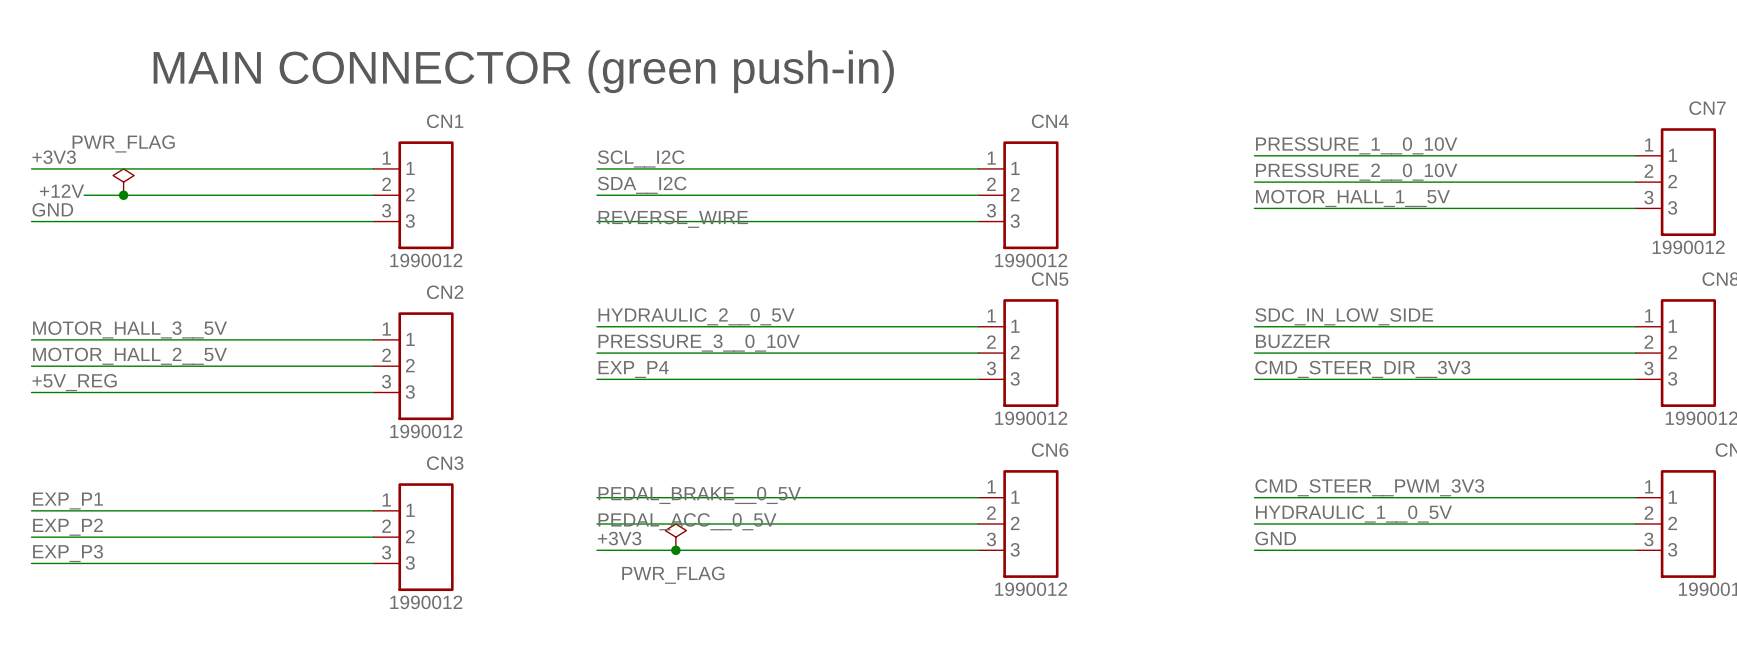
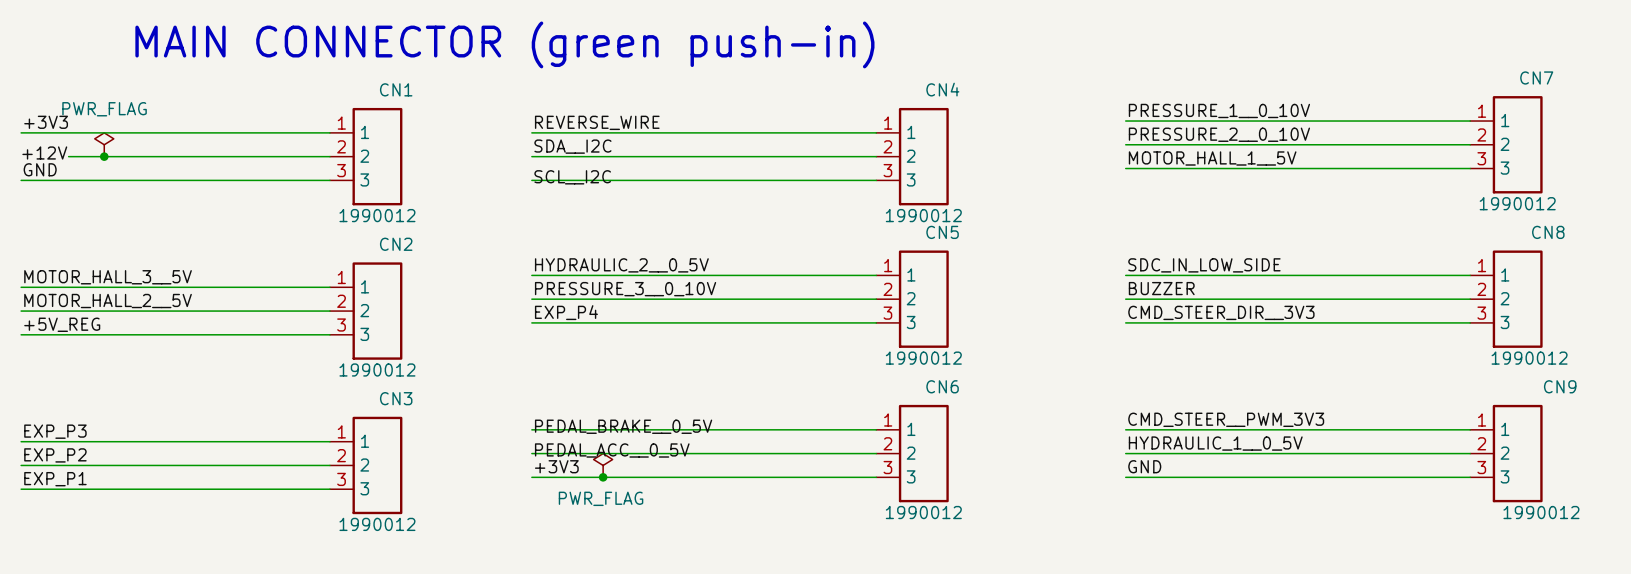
label: SCL__I2C (641, 159) -> REVERSE_WIRE (597, 122)
label: REVERSE_WIRE (673, 219) -> SCL__I2C (572, 177)
label: EXP_P1 (67, 501) -> EXP_P3 (55, 431)
label: EXP_P3 (68, 553) -> EXP_P1 (55, 479)

